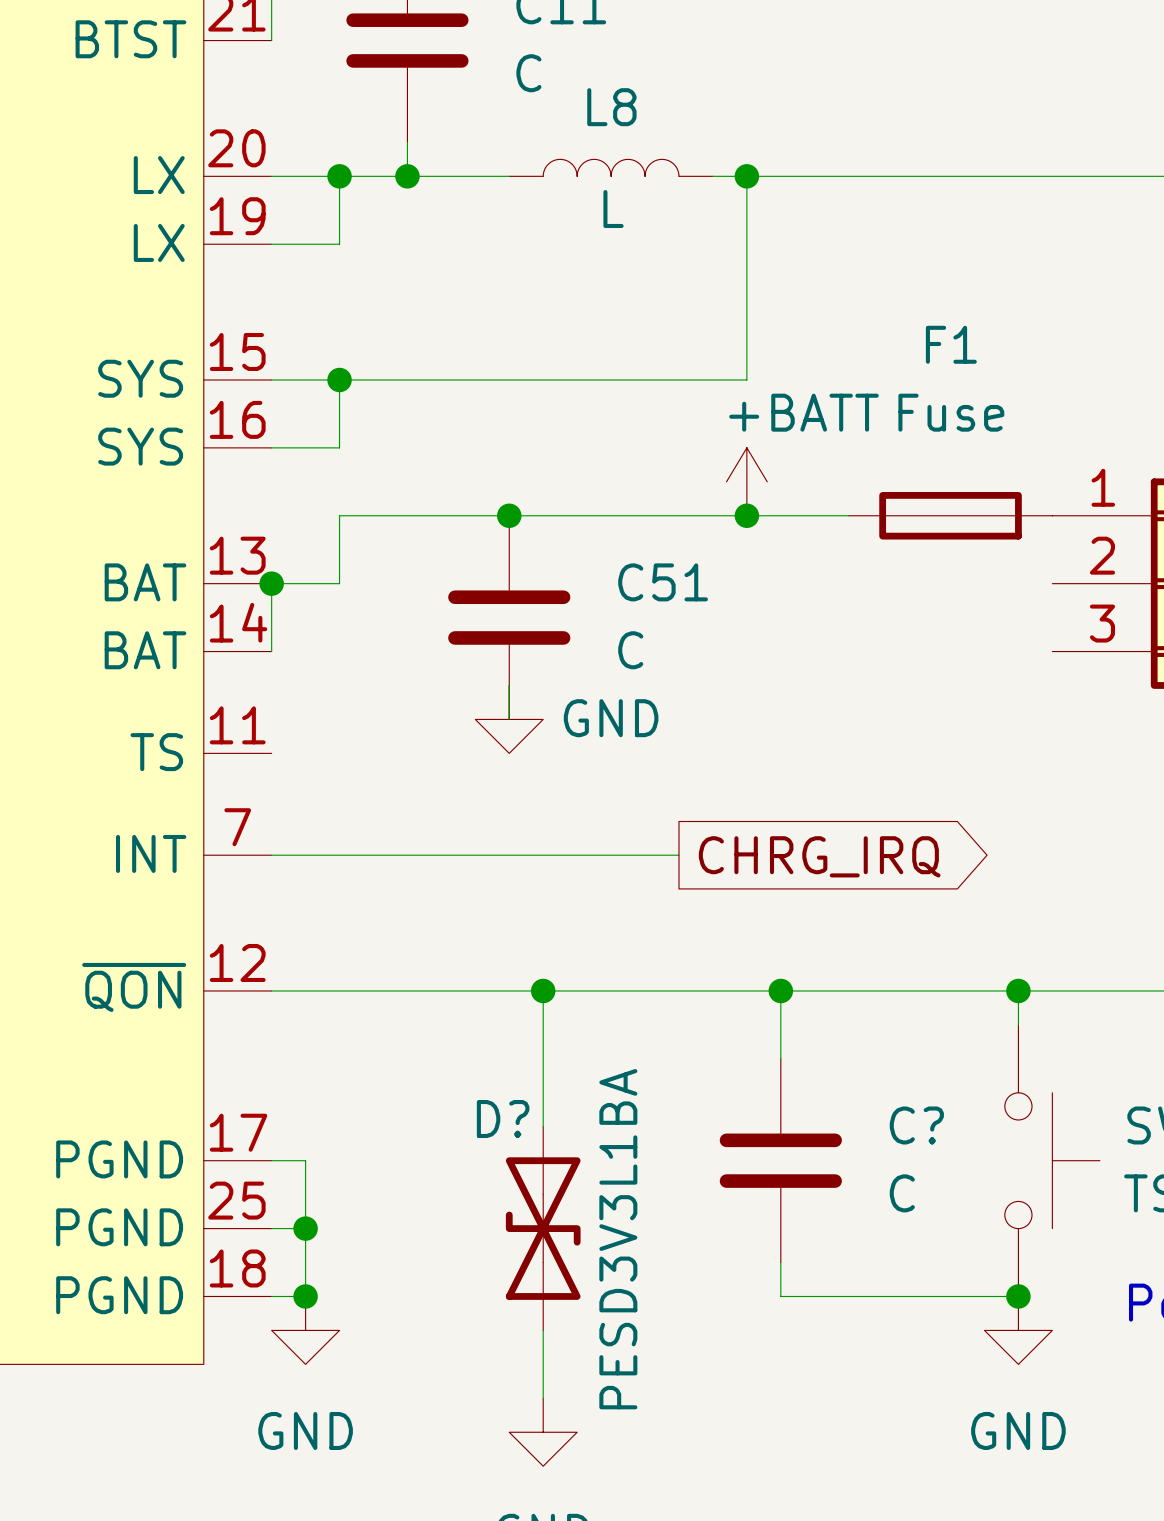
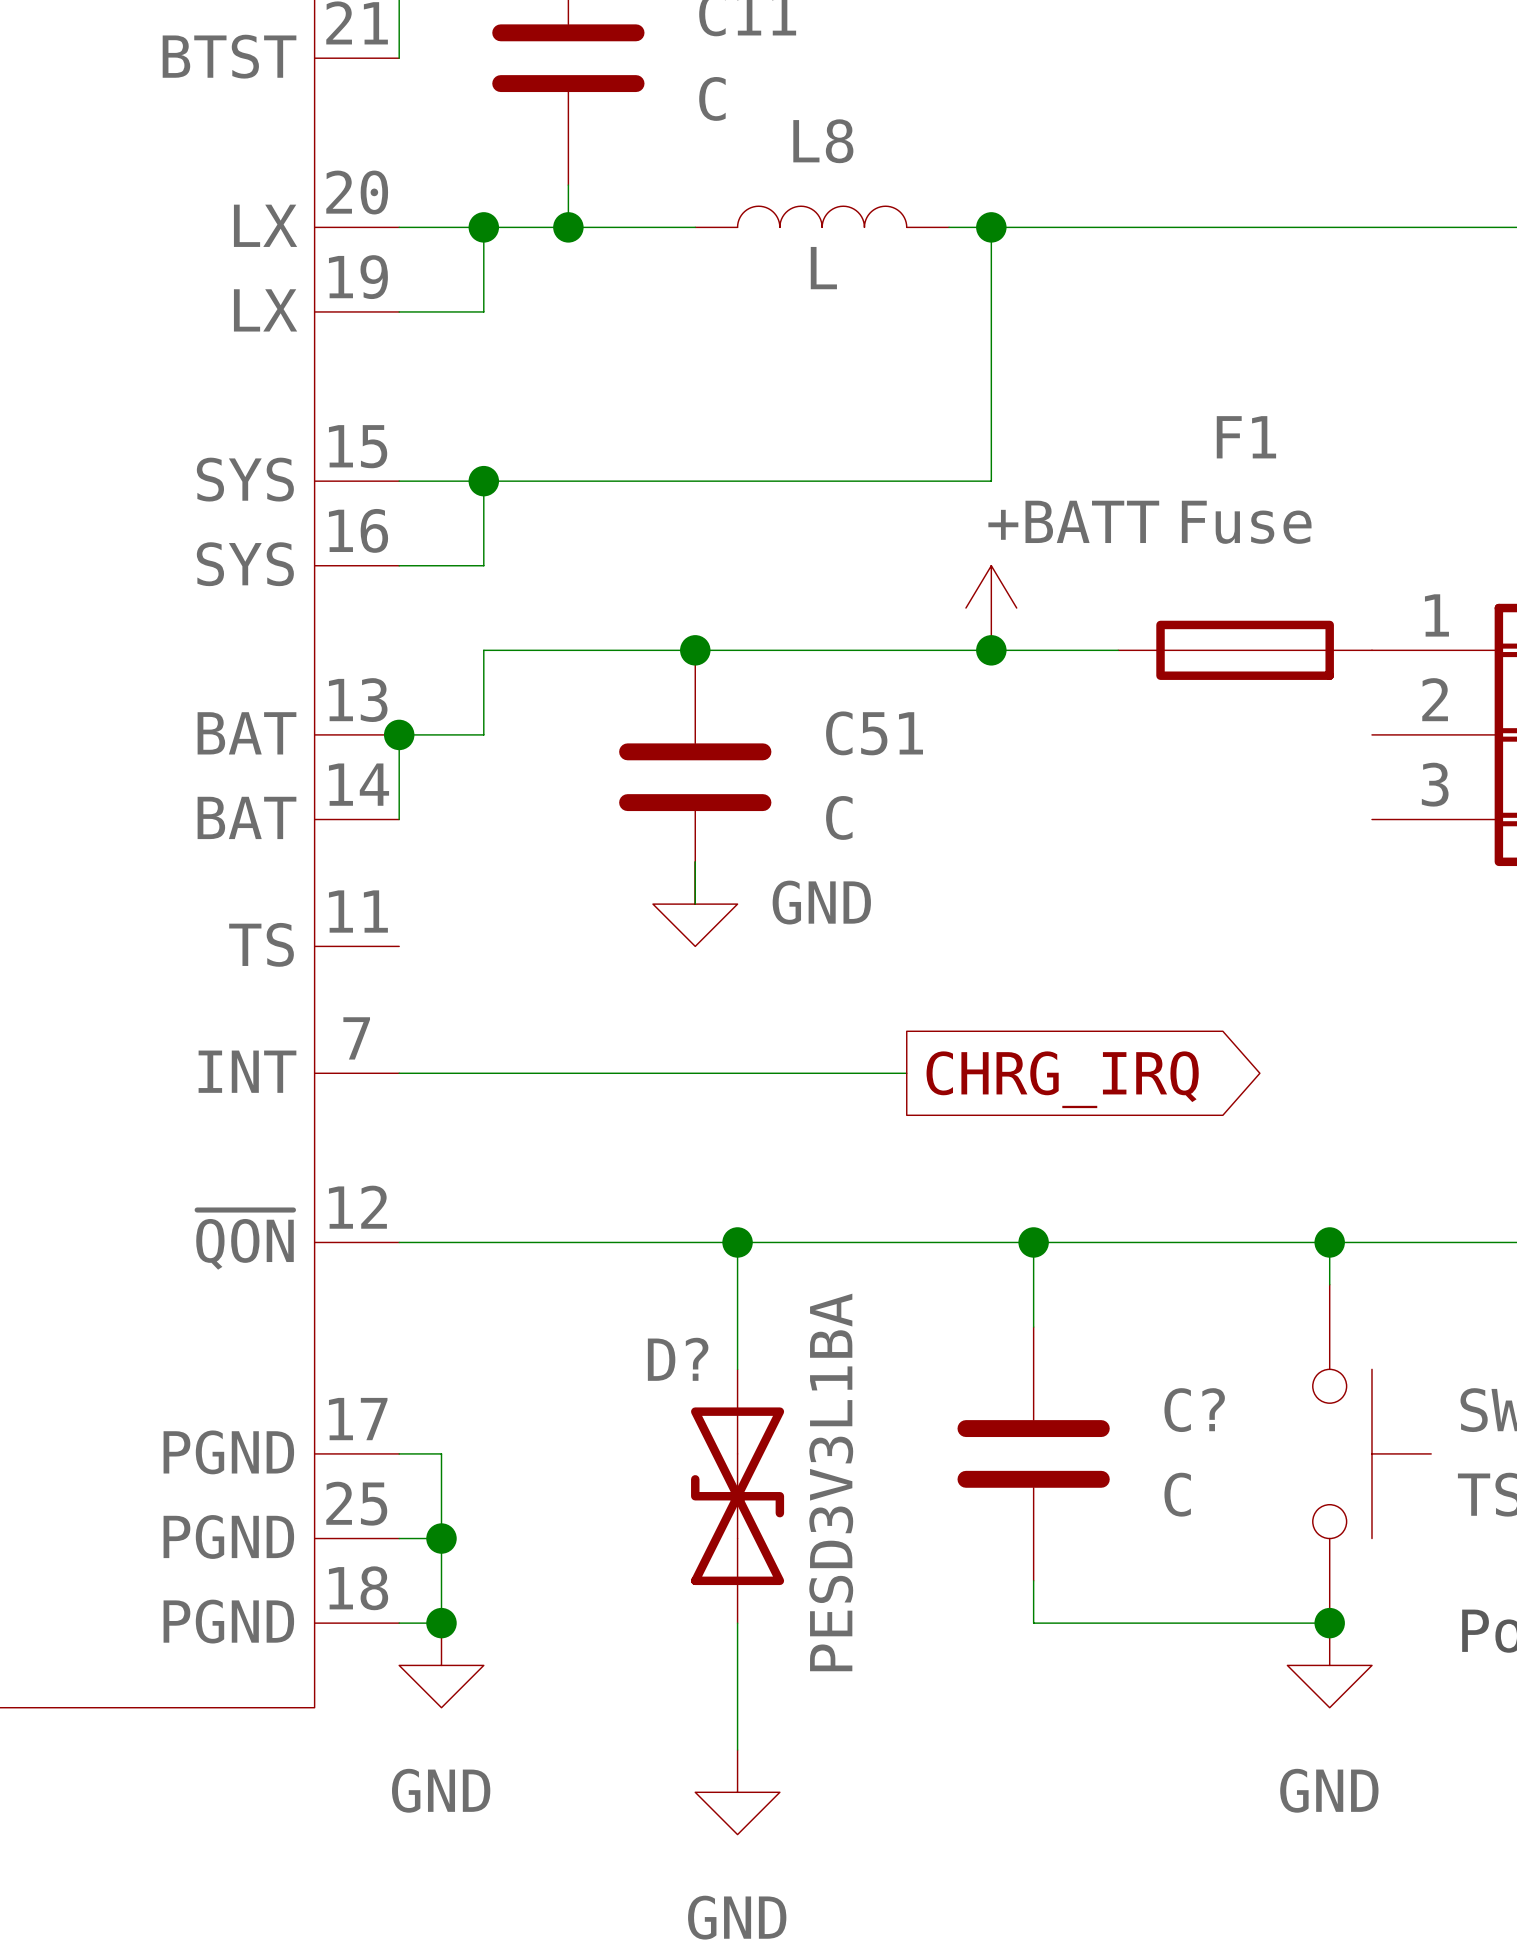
D? position: (543, 1228) -> (737, 1496)

